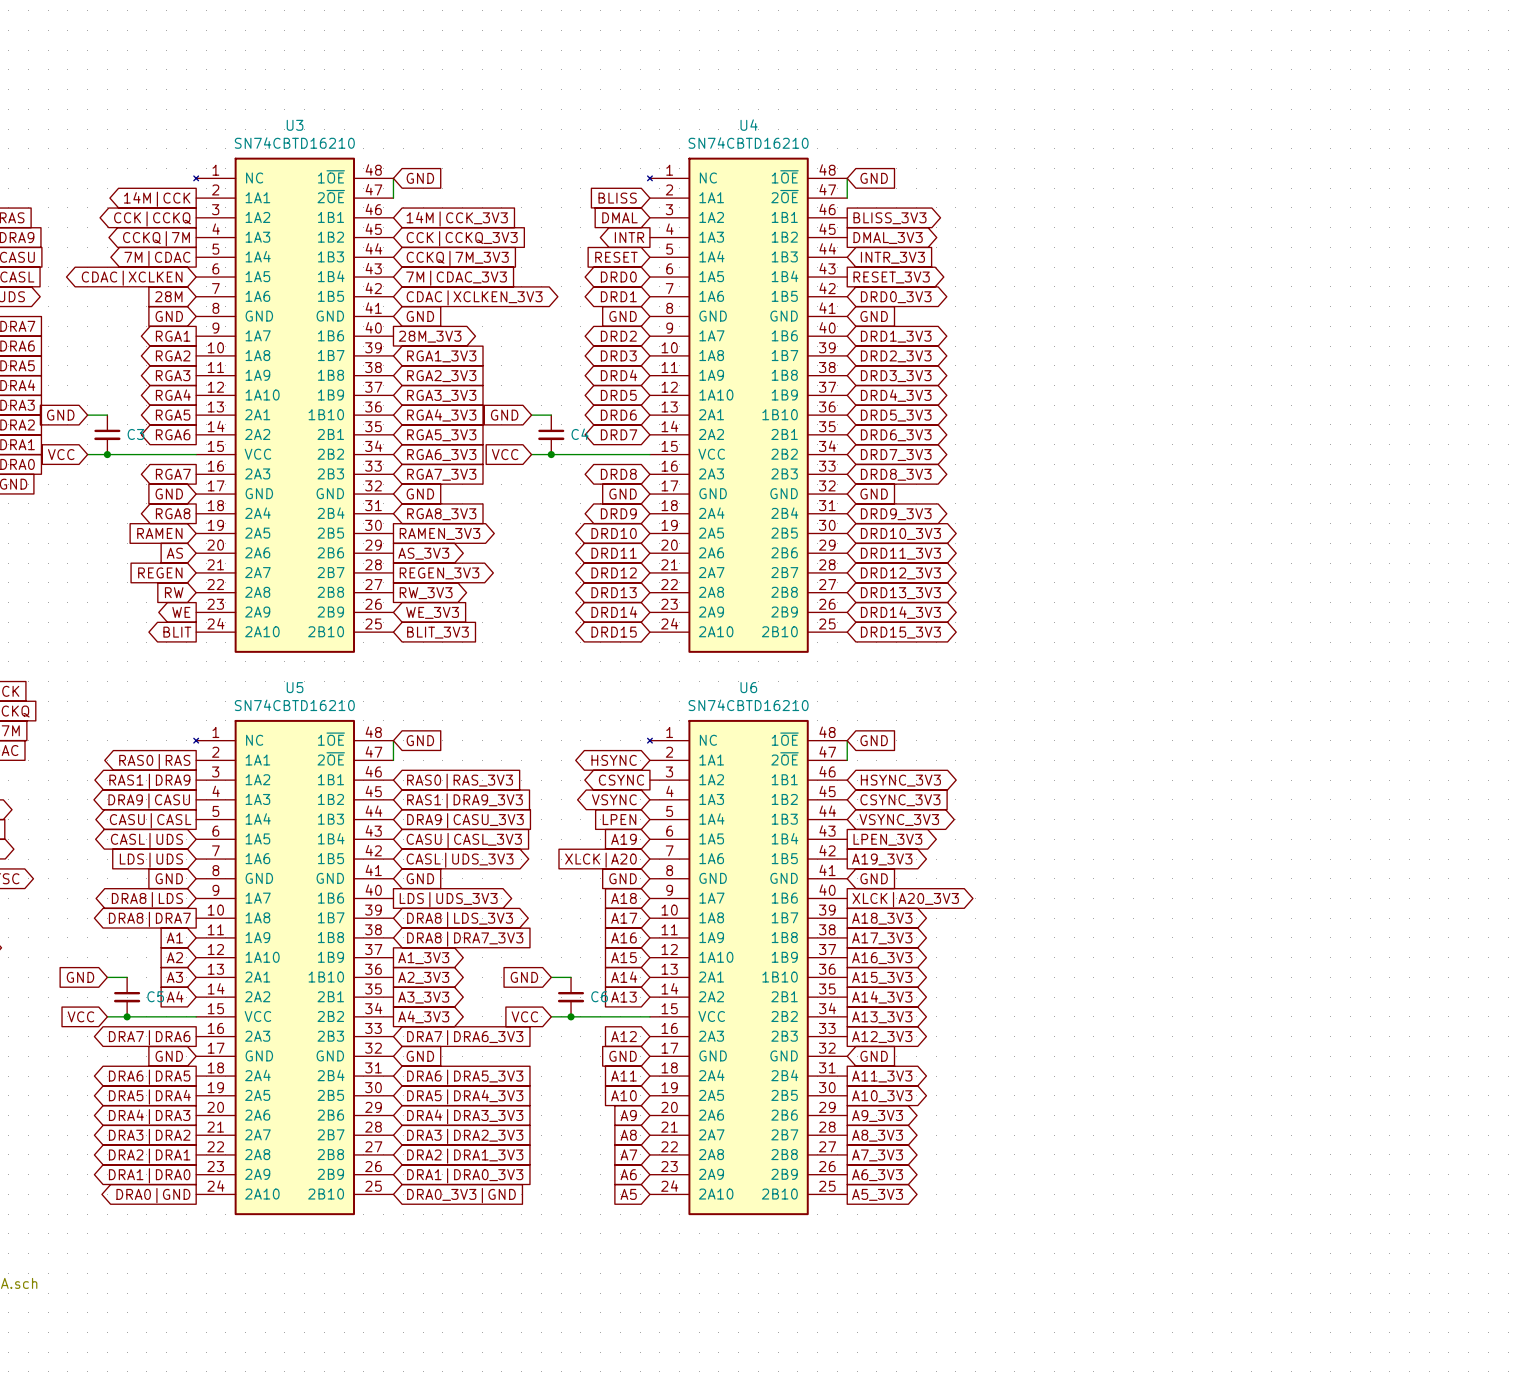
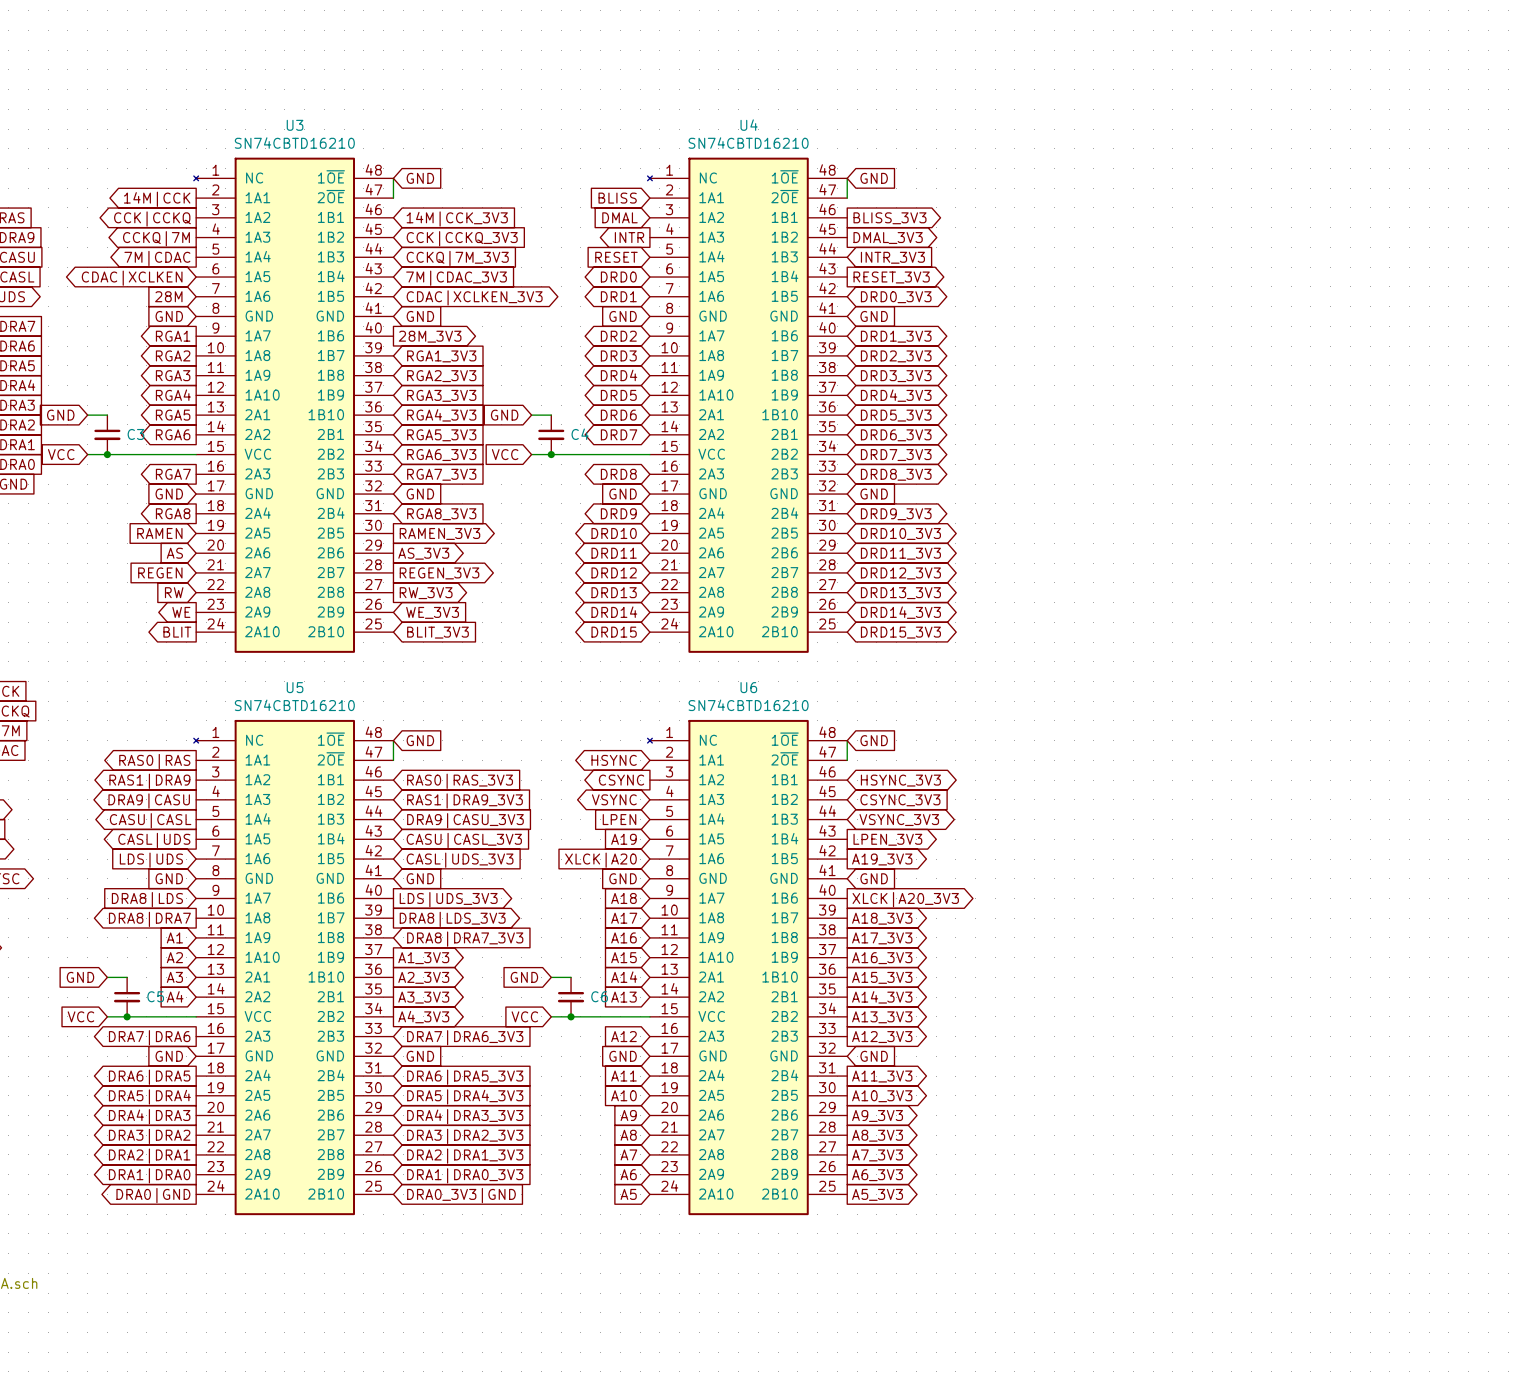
global label shape: bidirectional (146, 840) -> output (154, 840)
global label shape: bidirectional (460, 860) -> input (460, 860)
global label shape: bidirectional (147, 899) -> input (147, 899)
global label shape: bidirectional (460, 919) -> output (452, 919)

